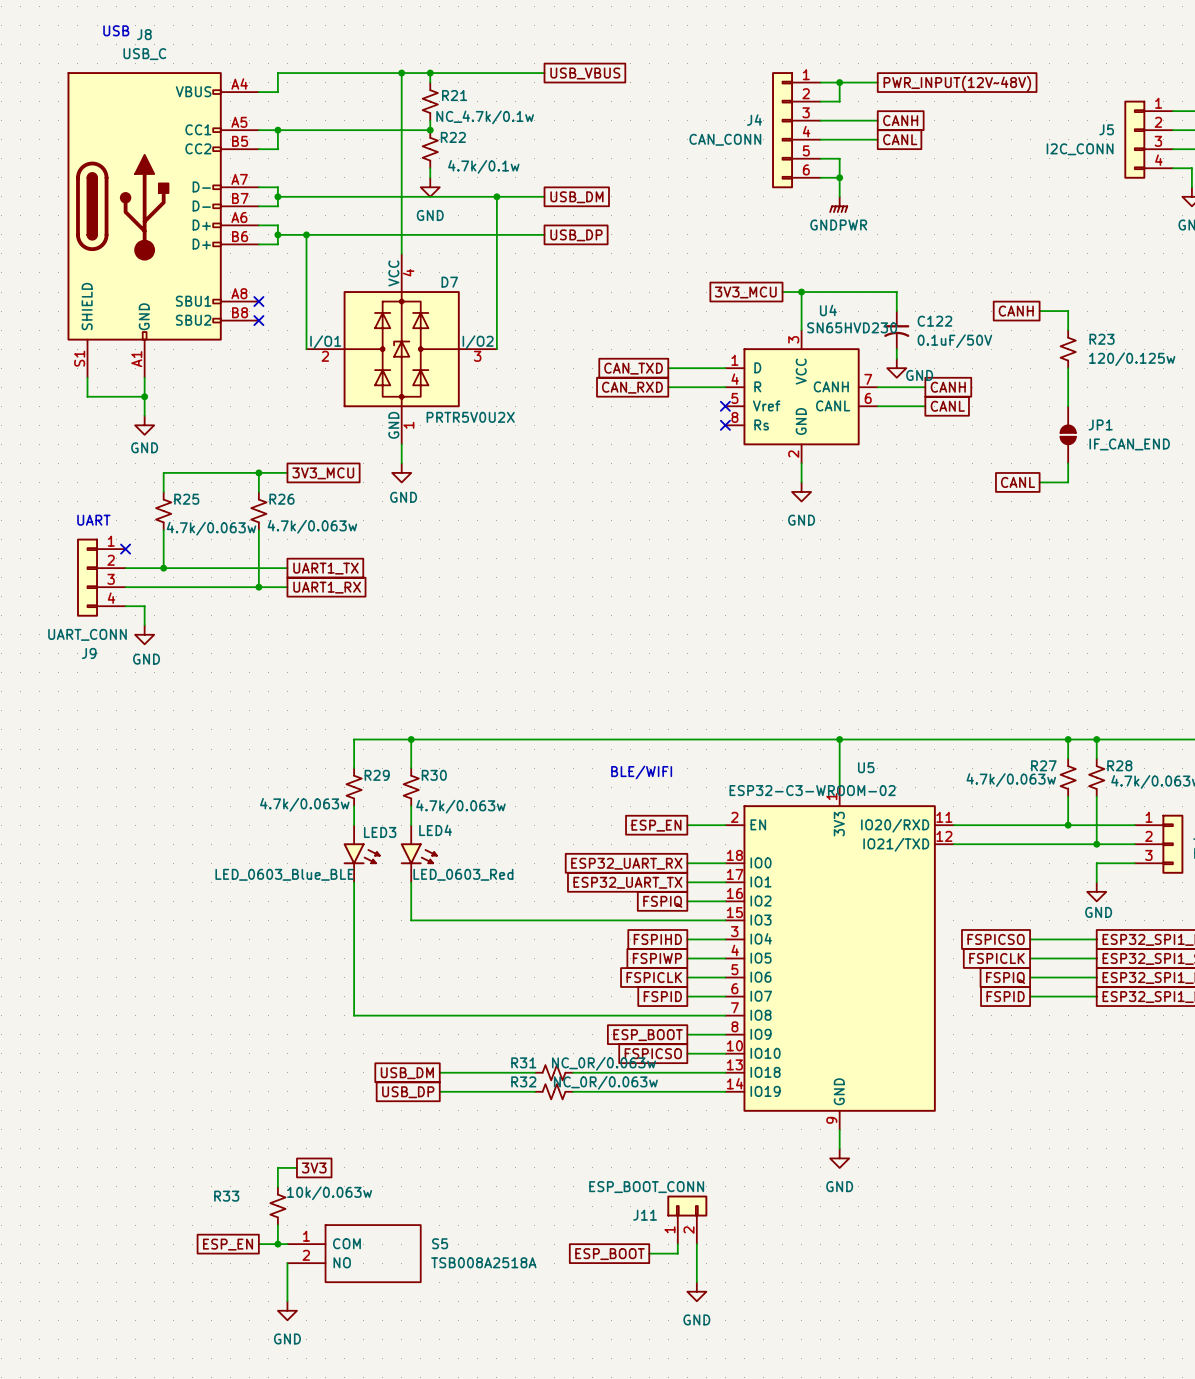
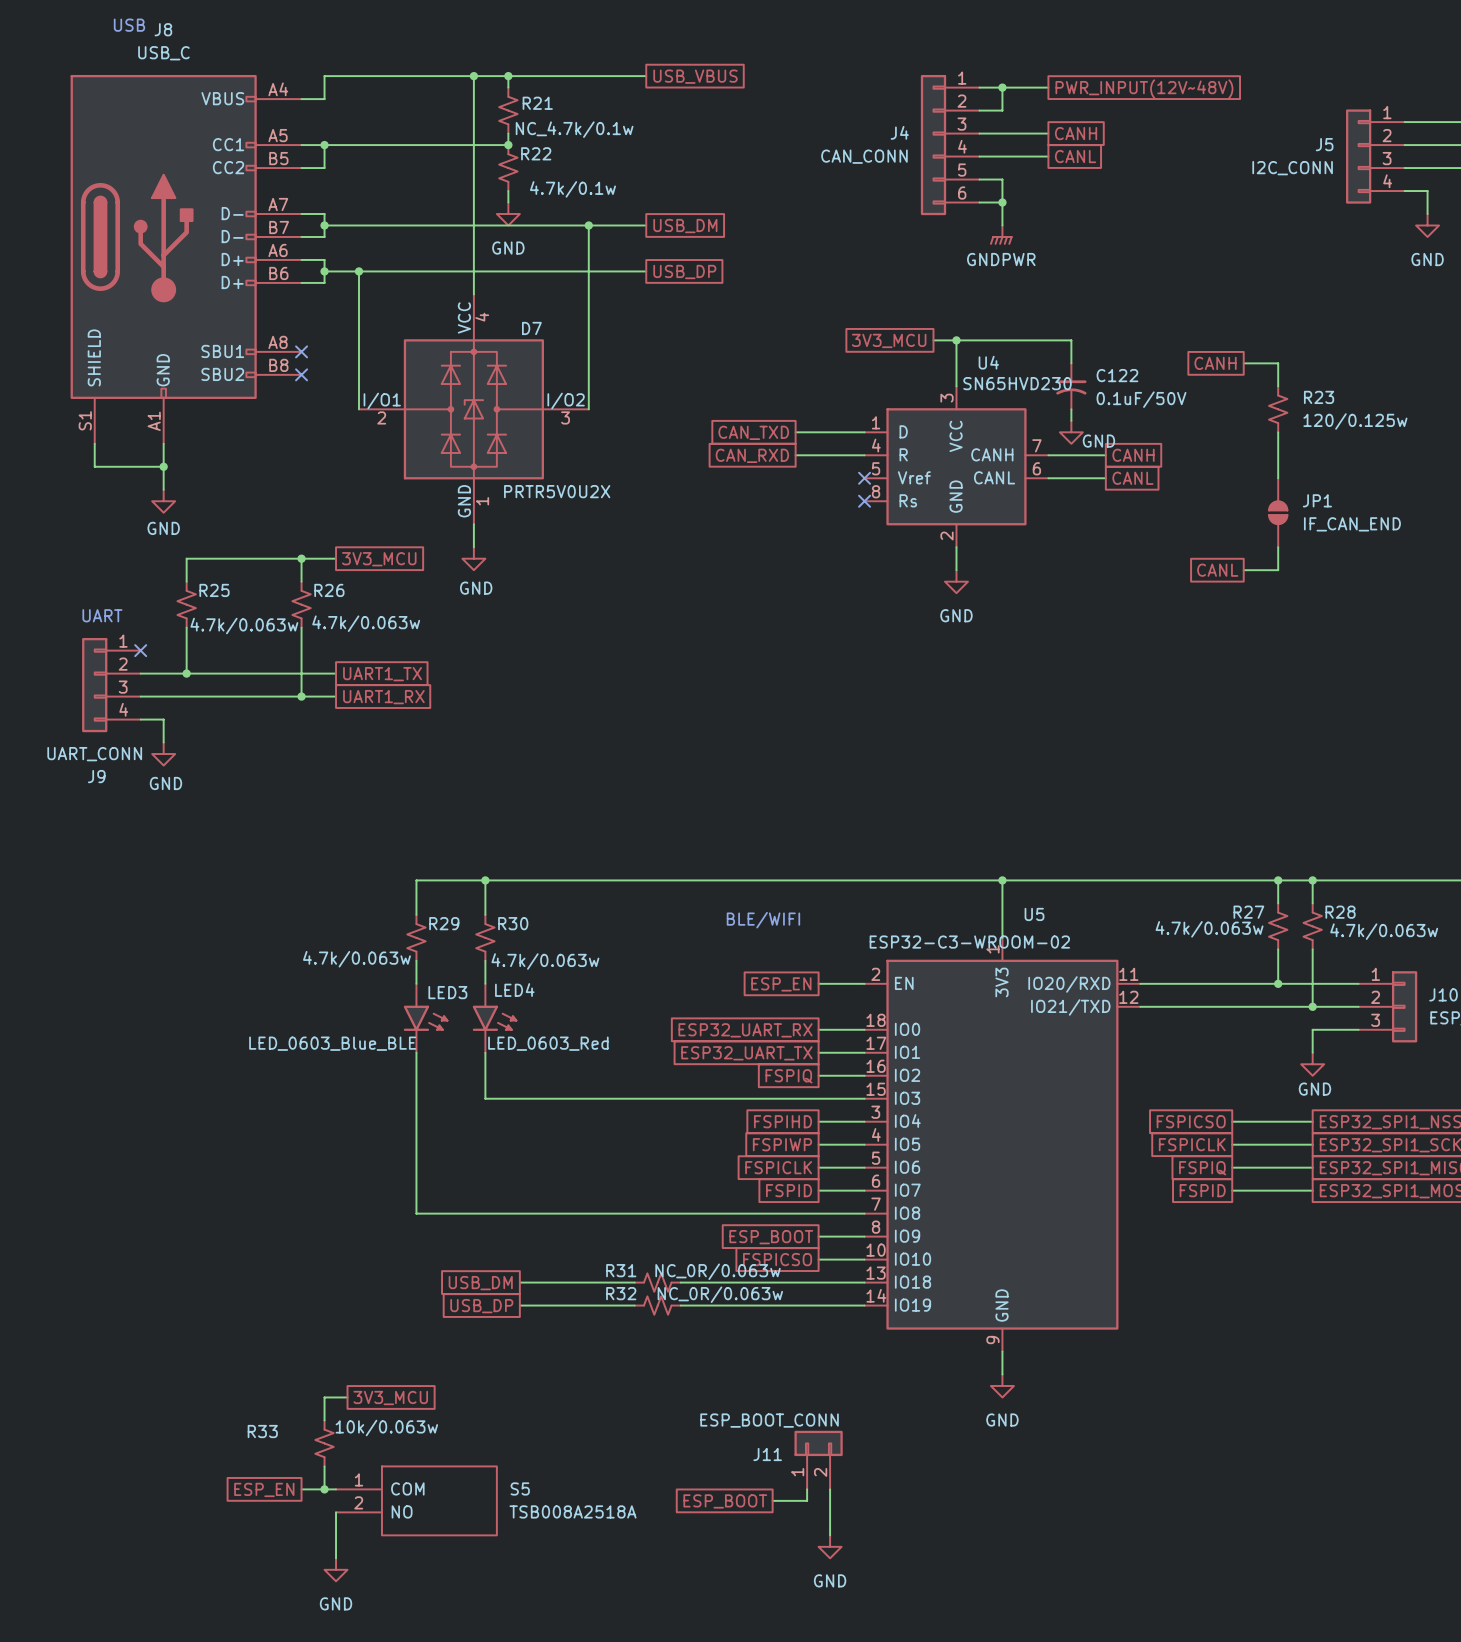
global label: 3V3 (314, 1167) -> 3V3_MCU (390, 1398)

